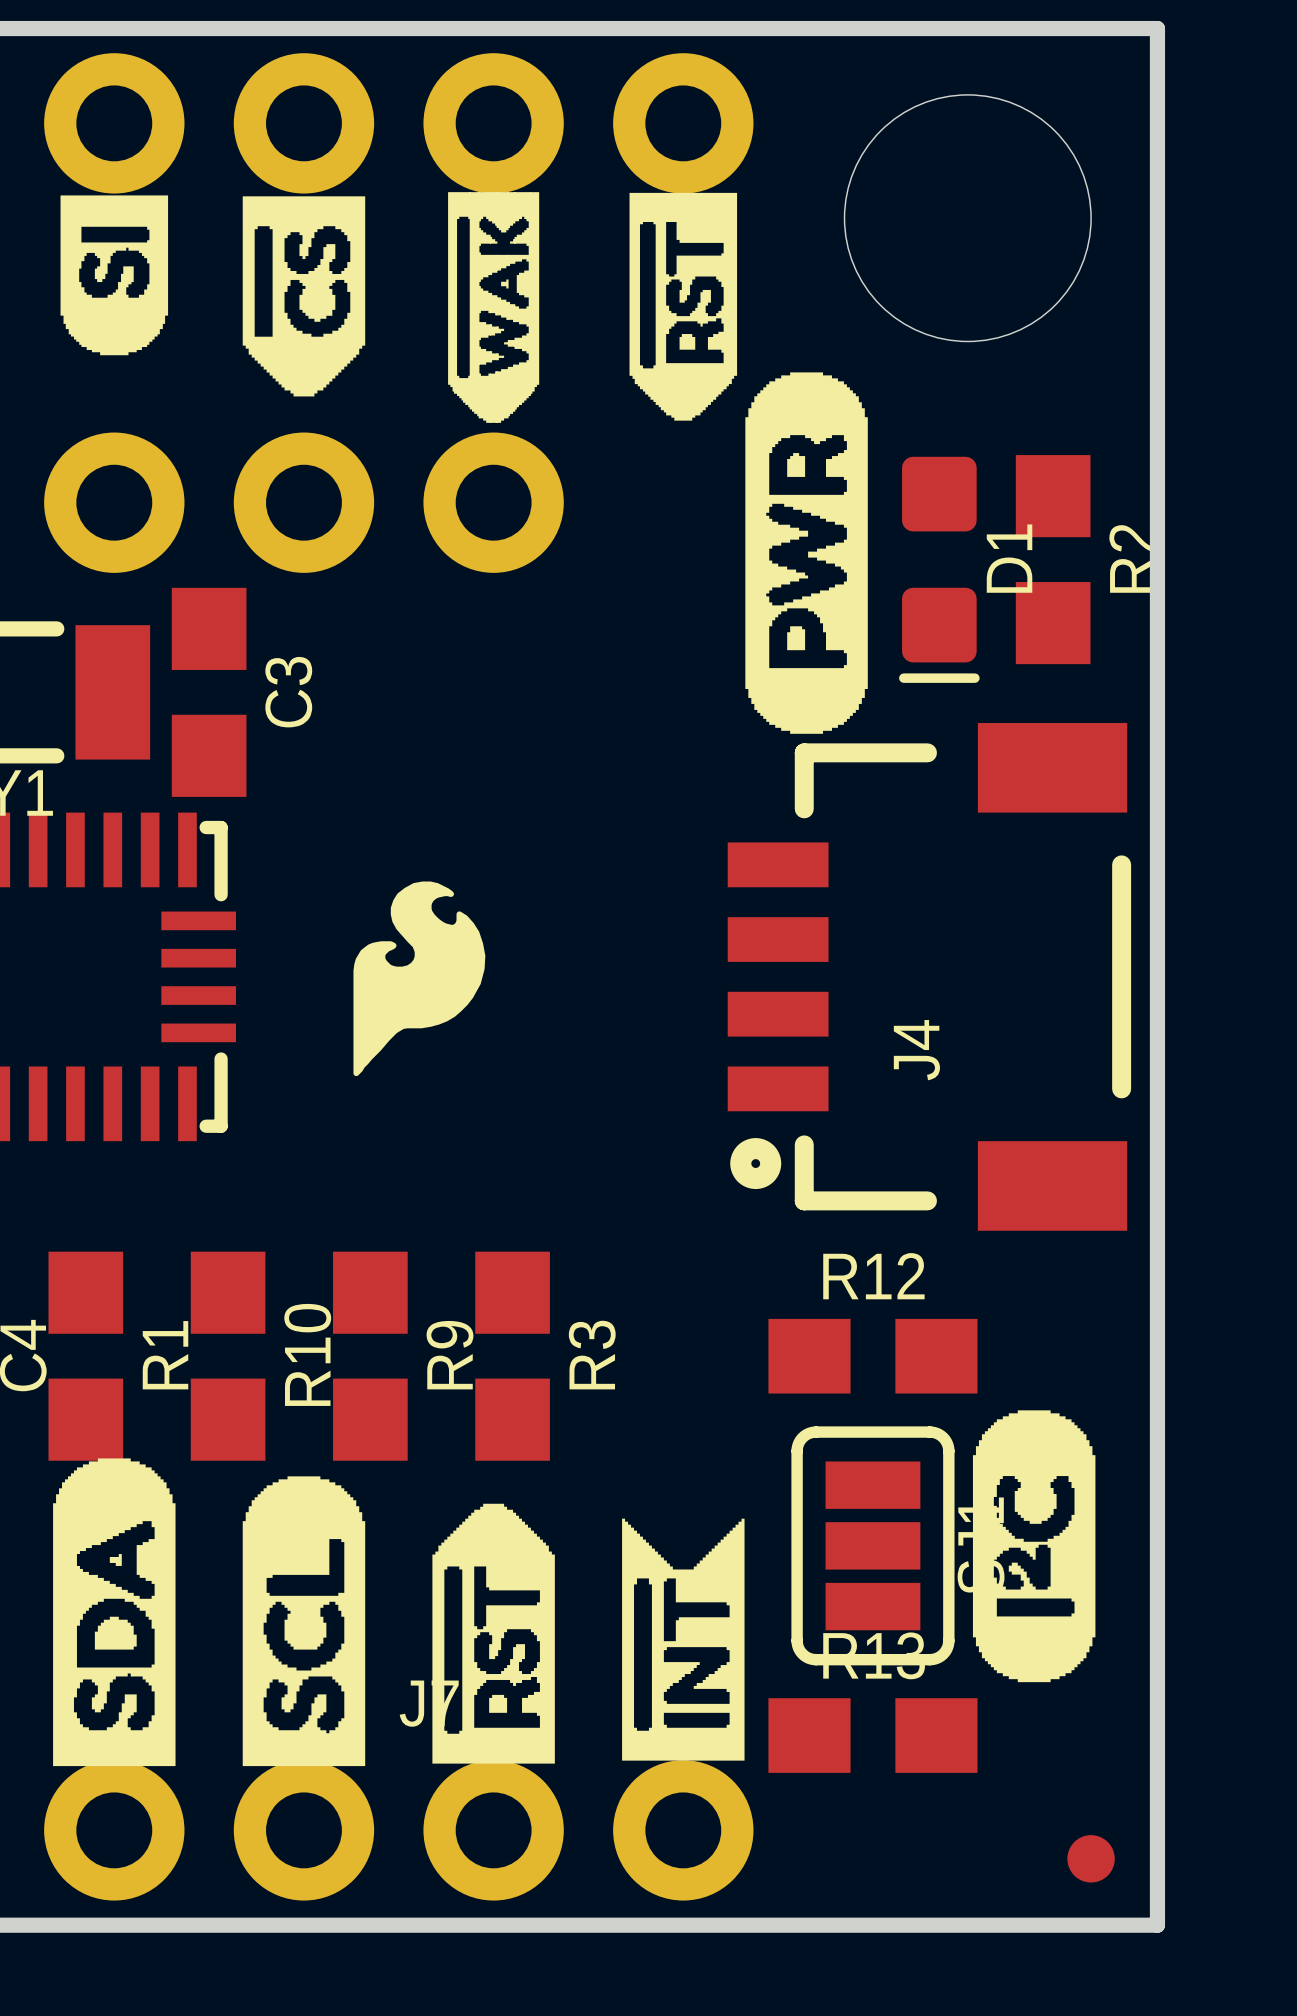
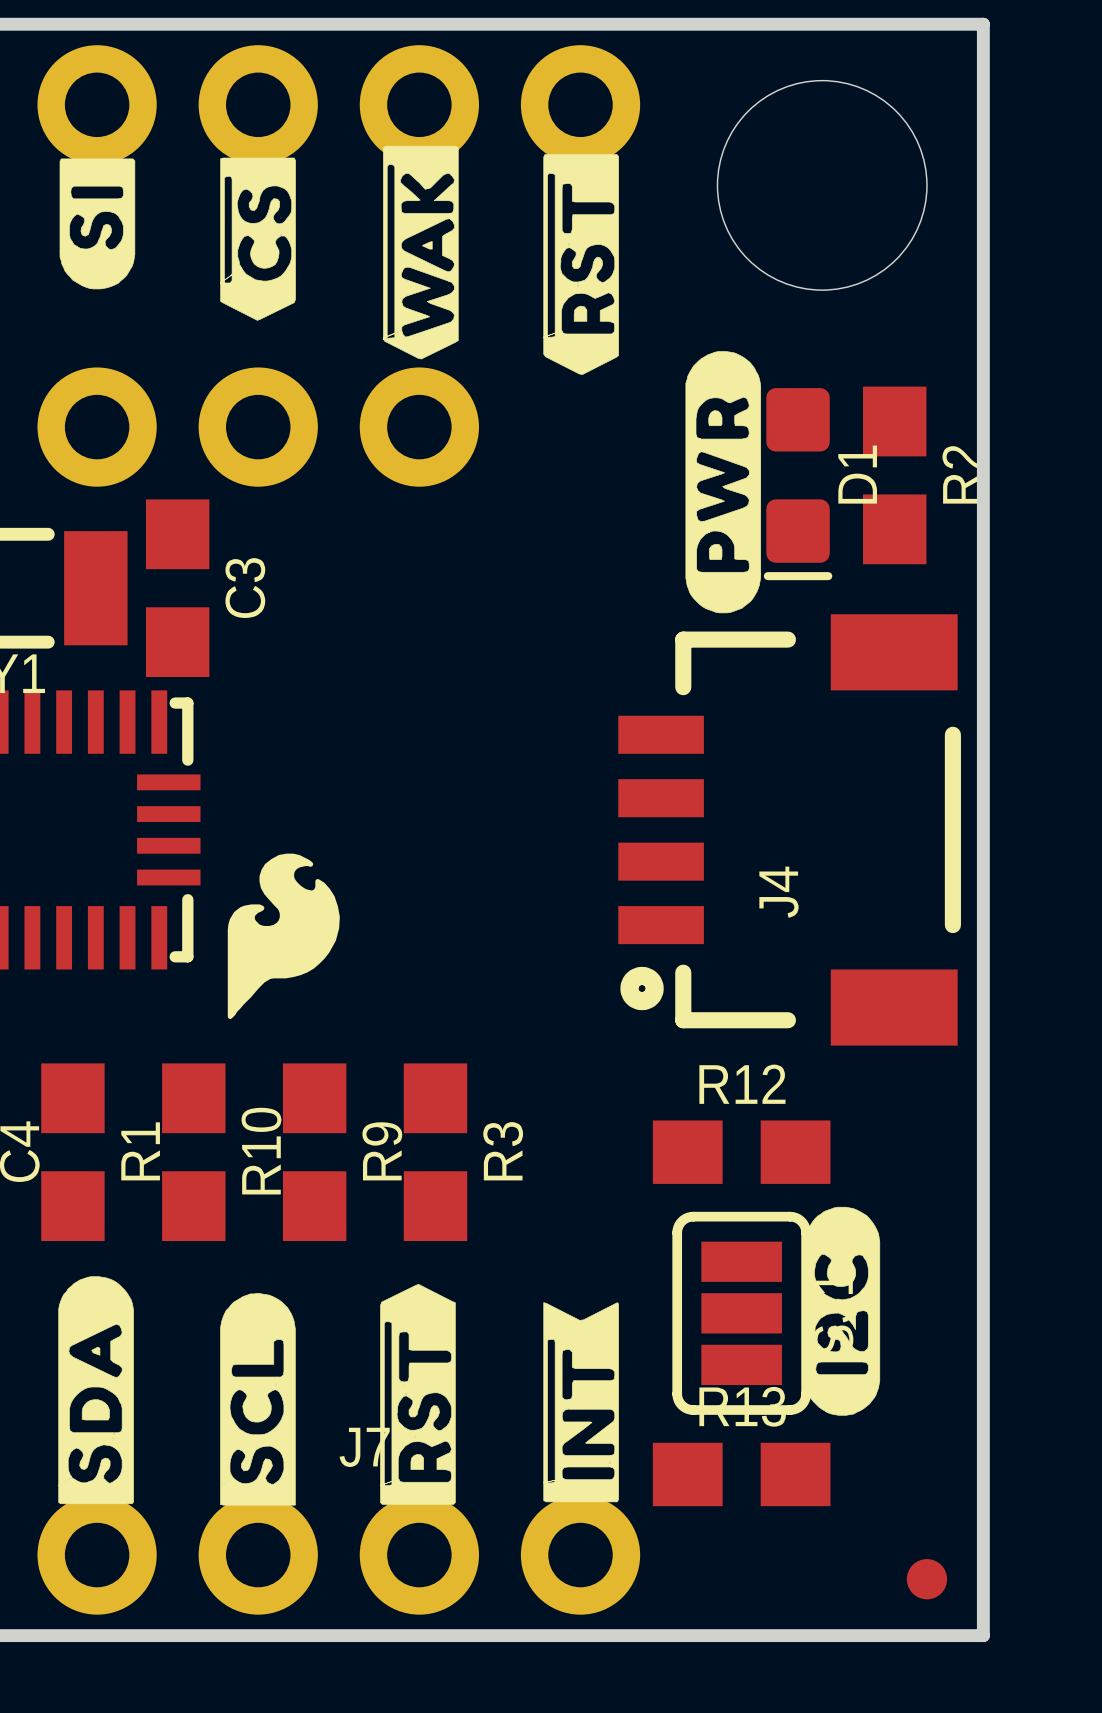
drawing shape: [448, 192, 540, 423] -> [383, 145, 459, 360]
drawing shape: [629, 192, 738, 421] -> [543, 154, 619, 375]
drawing shape: [60, 195, 169, 356] -> [59, 158, 136, 290]
drawing shape: [242, 196, 366, 397] -> [220, 157, 296, 321]
drawing shape: [745, 372, 868, 734] -> [685, 351, 762, 614]
drawing position: (419, 978) -> (283, 936)
drawing shape: [972, 1410, 1096, 1683] -> [804, 1206, 881, 1416]
drawing shape: [53, 1458, 176, 1767] -> [58, 1276, 134, 1505]
drawing shape: [242, 1476, 366, 1767] -> [220, 1292, 296, 1506]
drawing shape: [432, 1503, 555, 1764] -> [380, 1283, 456, 1505]
drawing shape: [622, 1518, 745, 1761] -> [543, 1302, 619, 1503]

